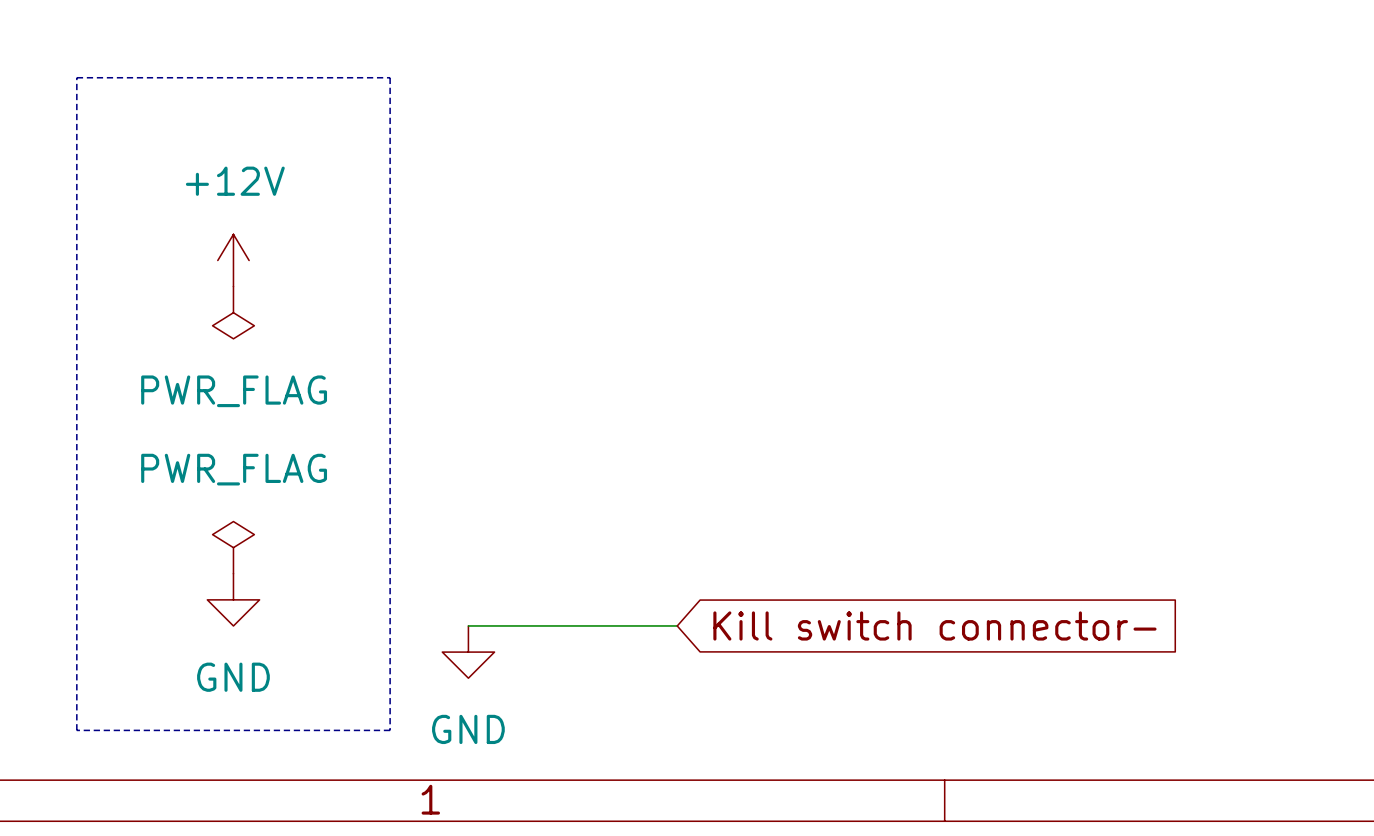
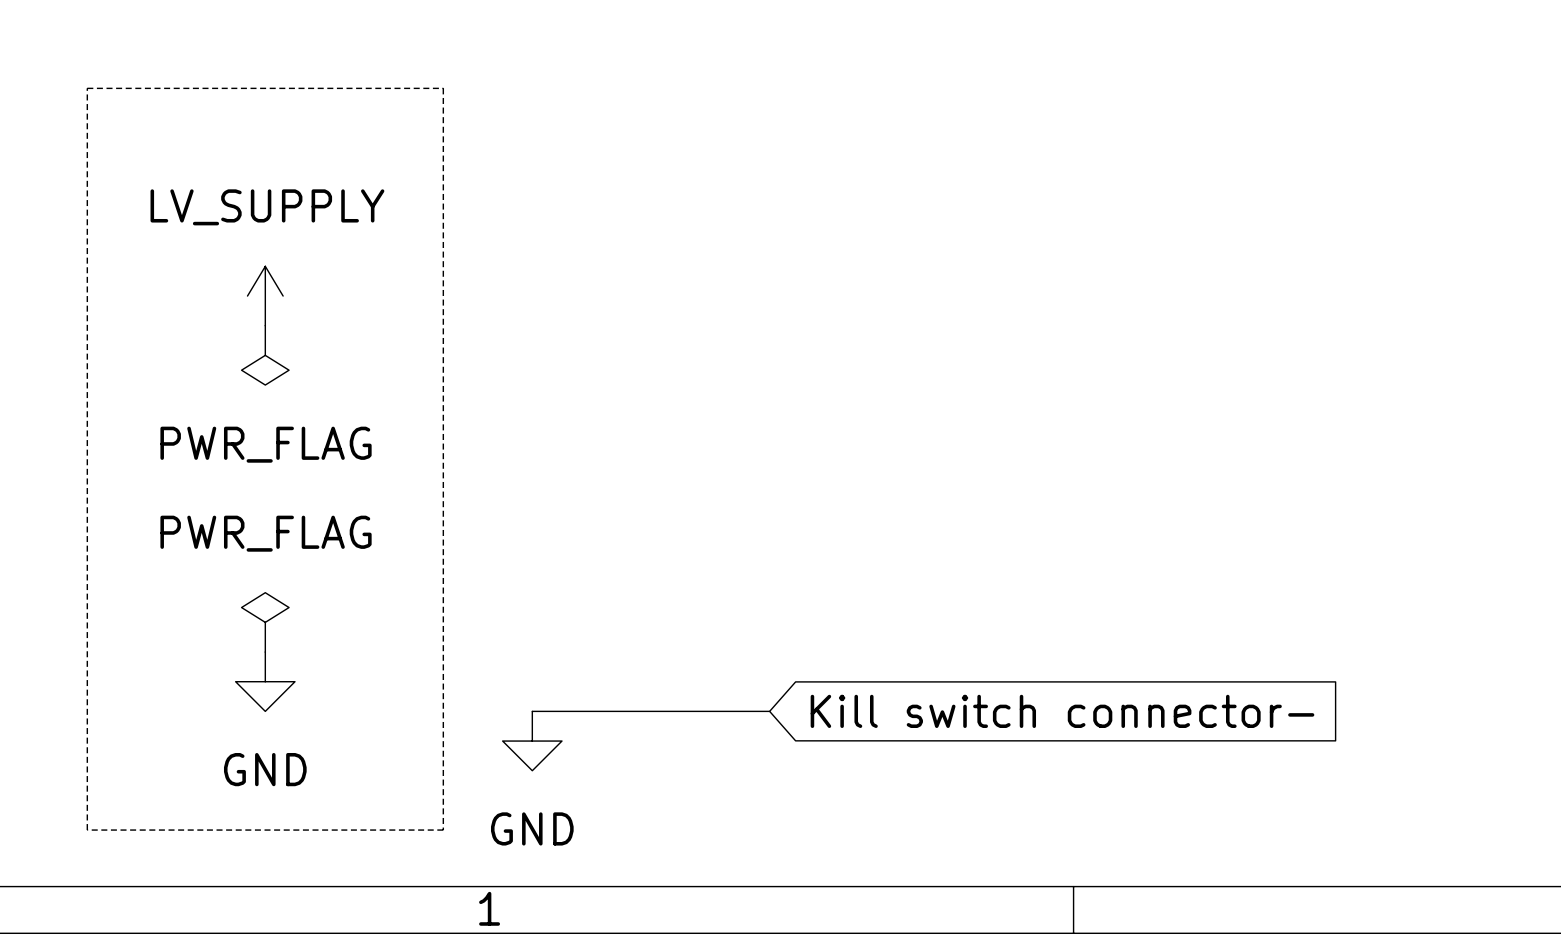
power symbol: +12V (233, 260) -> LV_SUPPLY (265, 296)

